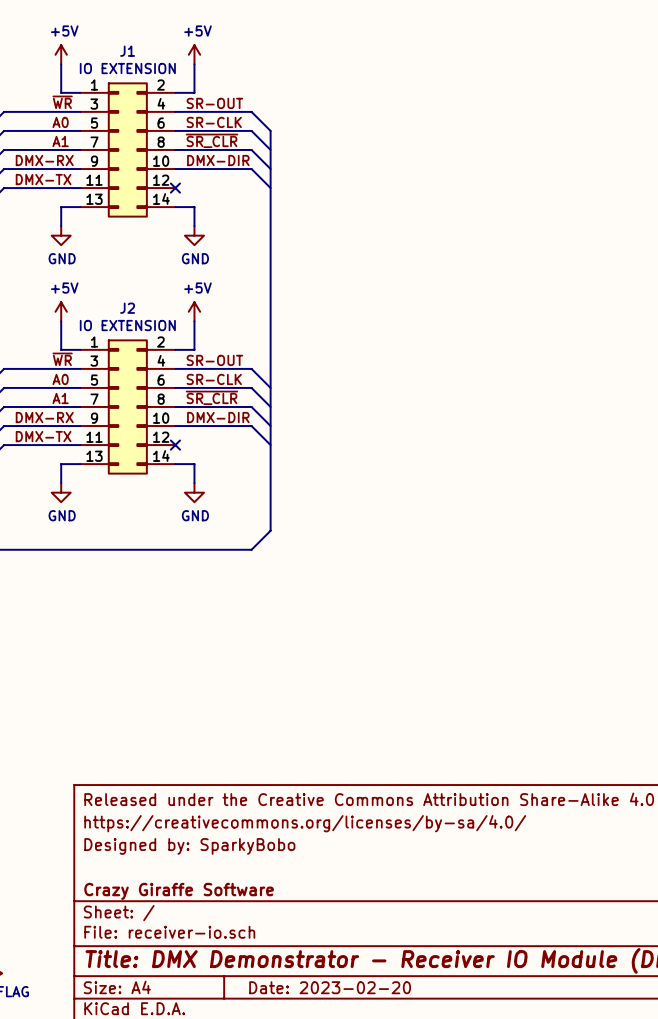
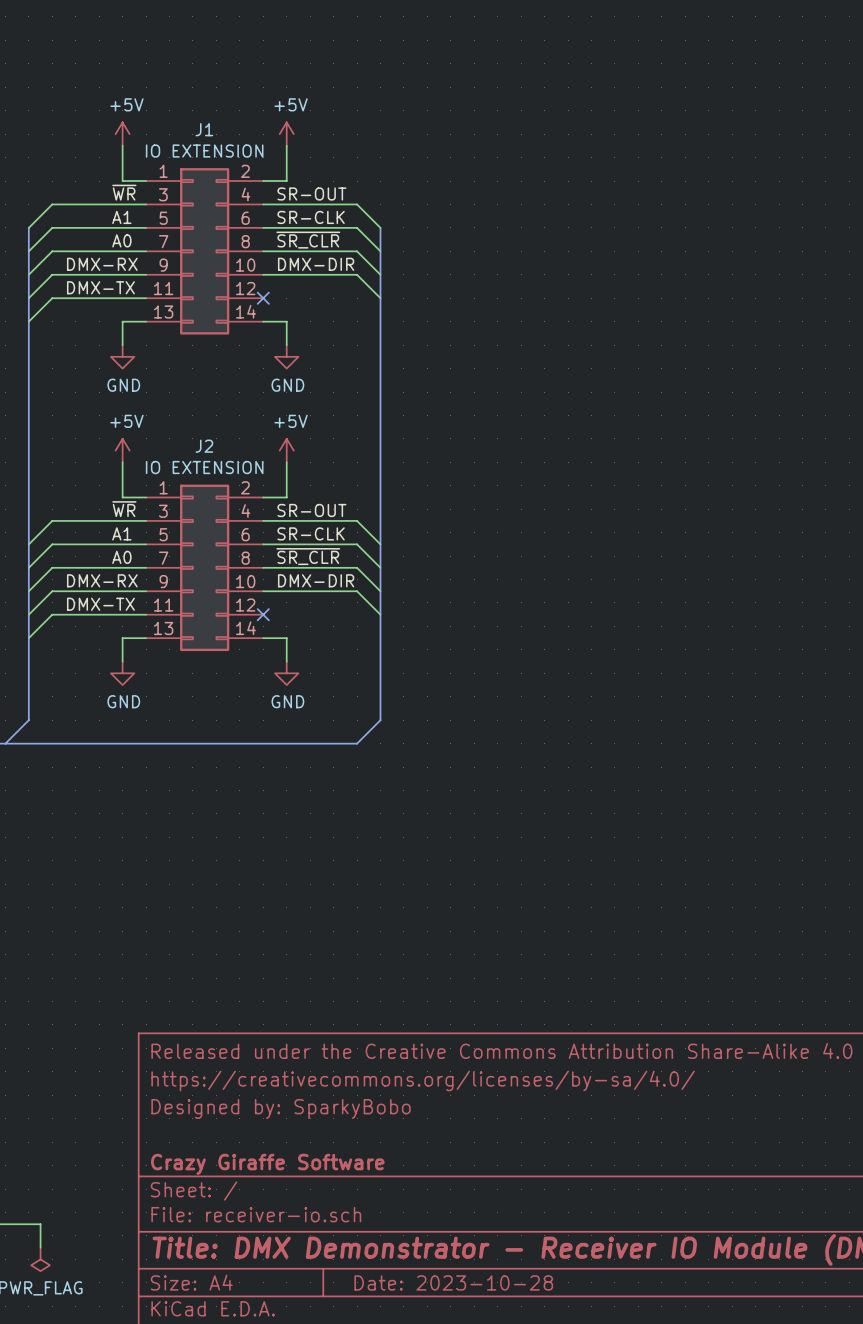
label: A0 (60, 122) -> A1 (121, 217)
label: A1 (60, 141) -> A0 (121, 240)
label: A0 (60, 379) -> A1 (121, 533)
label: A1 (60, 398) -> A0 (121, 557)
title block: Date: 2023-02-20 (330, 987) -> Date: 2023-10-28 (453, 1282)

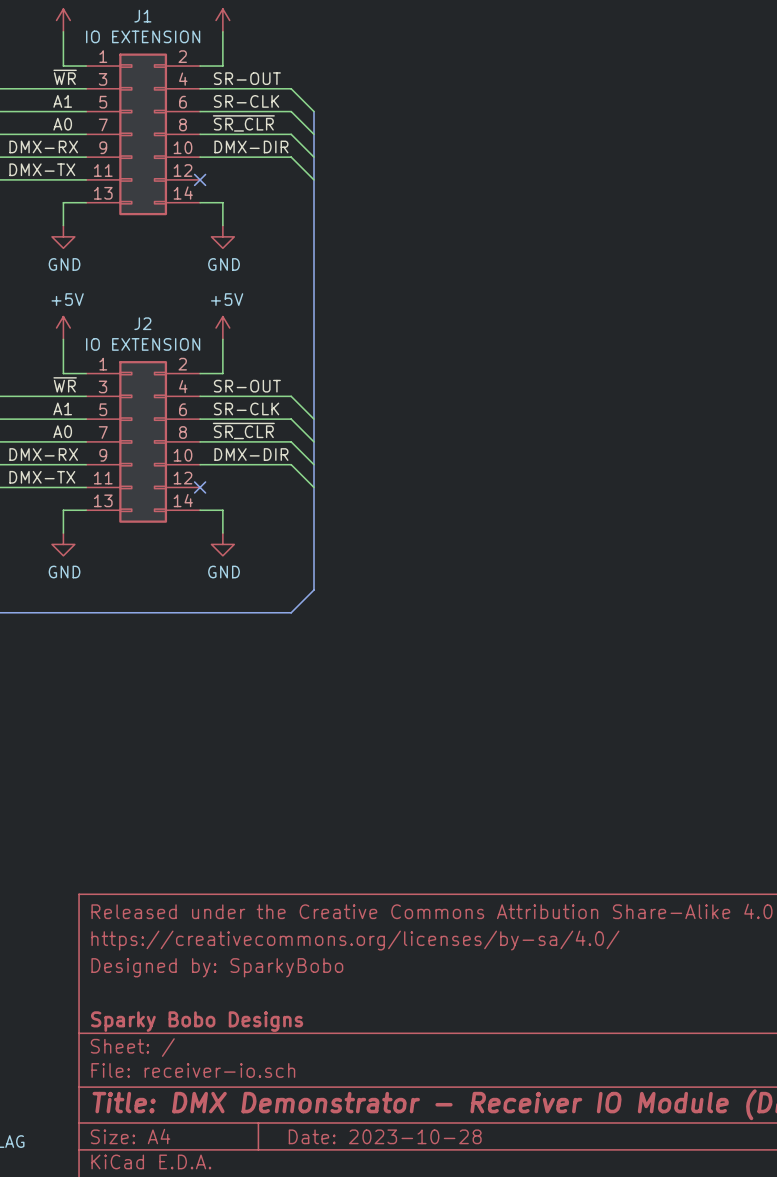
title block: Crazy Giraffe Software (267, 1164) -> Sparky Bobo Designs (197, 1021)

